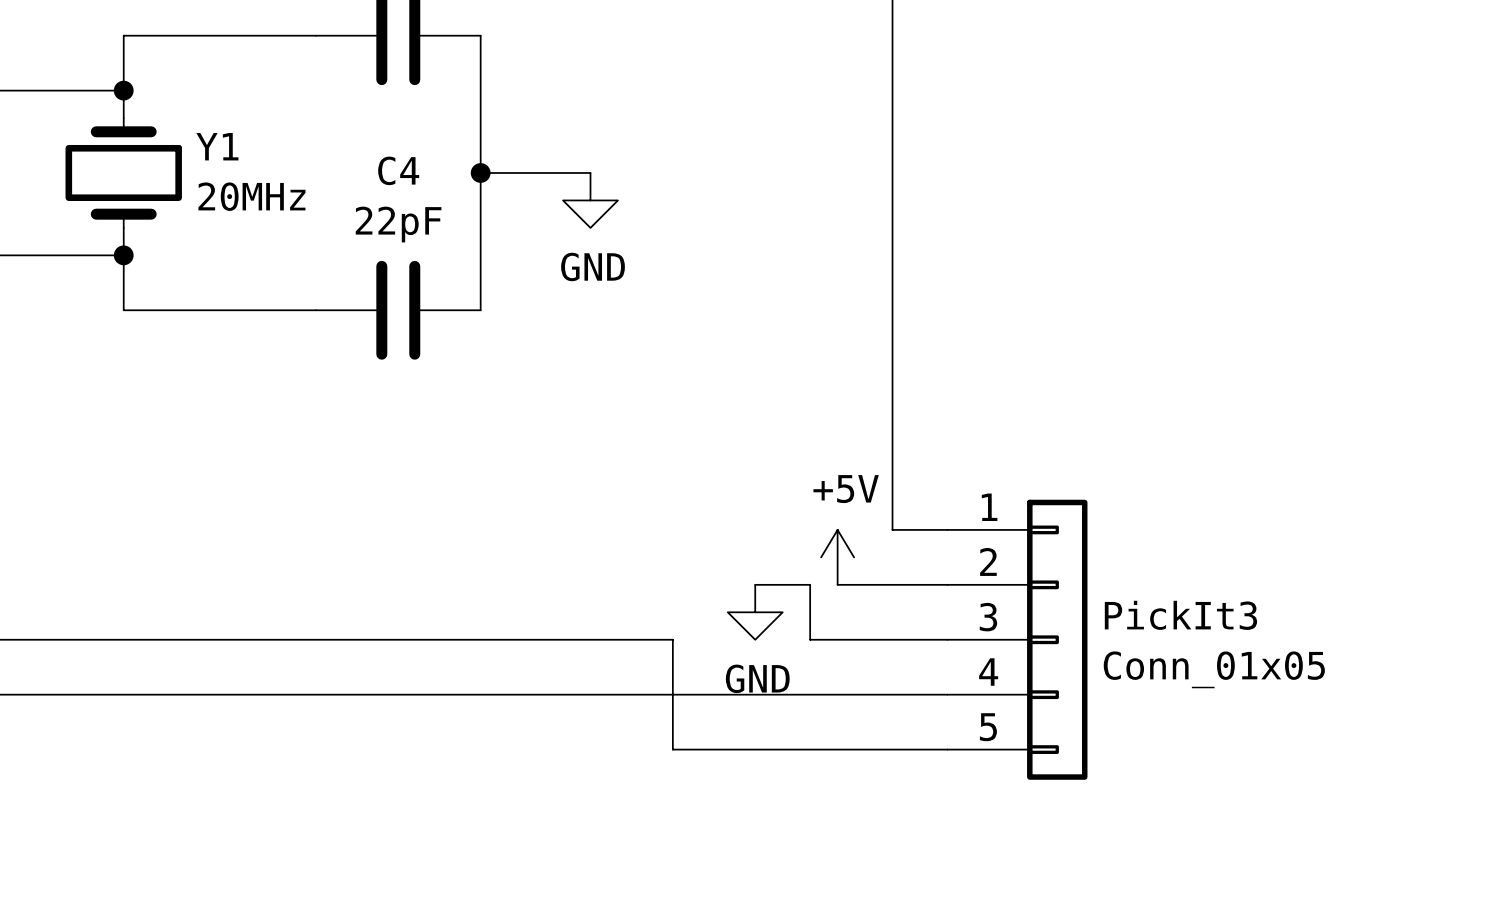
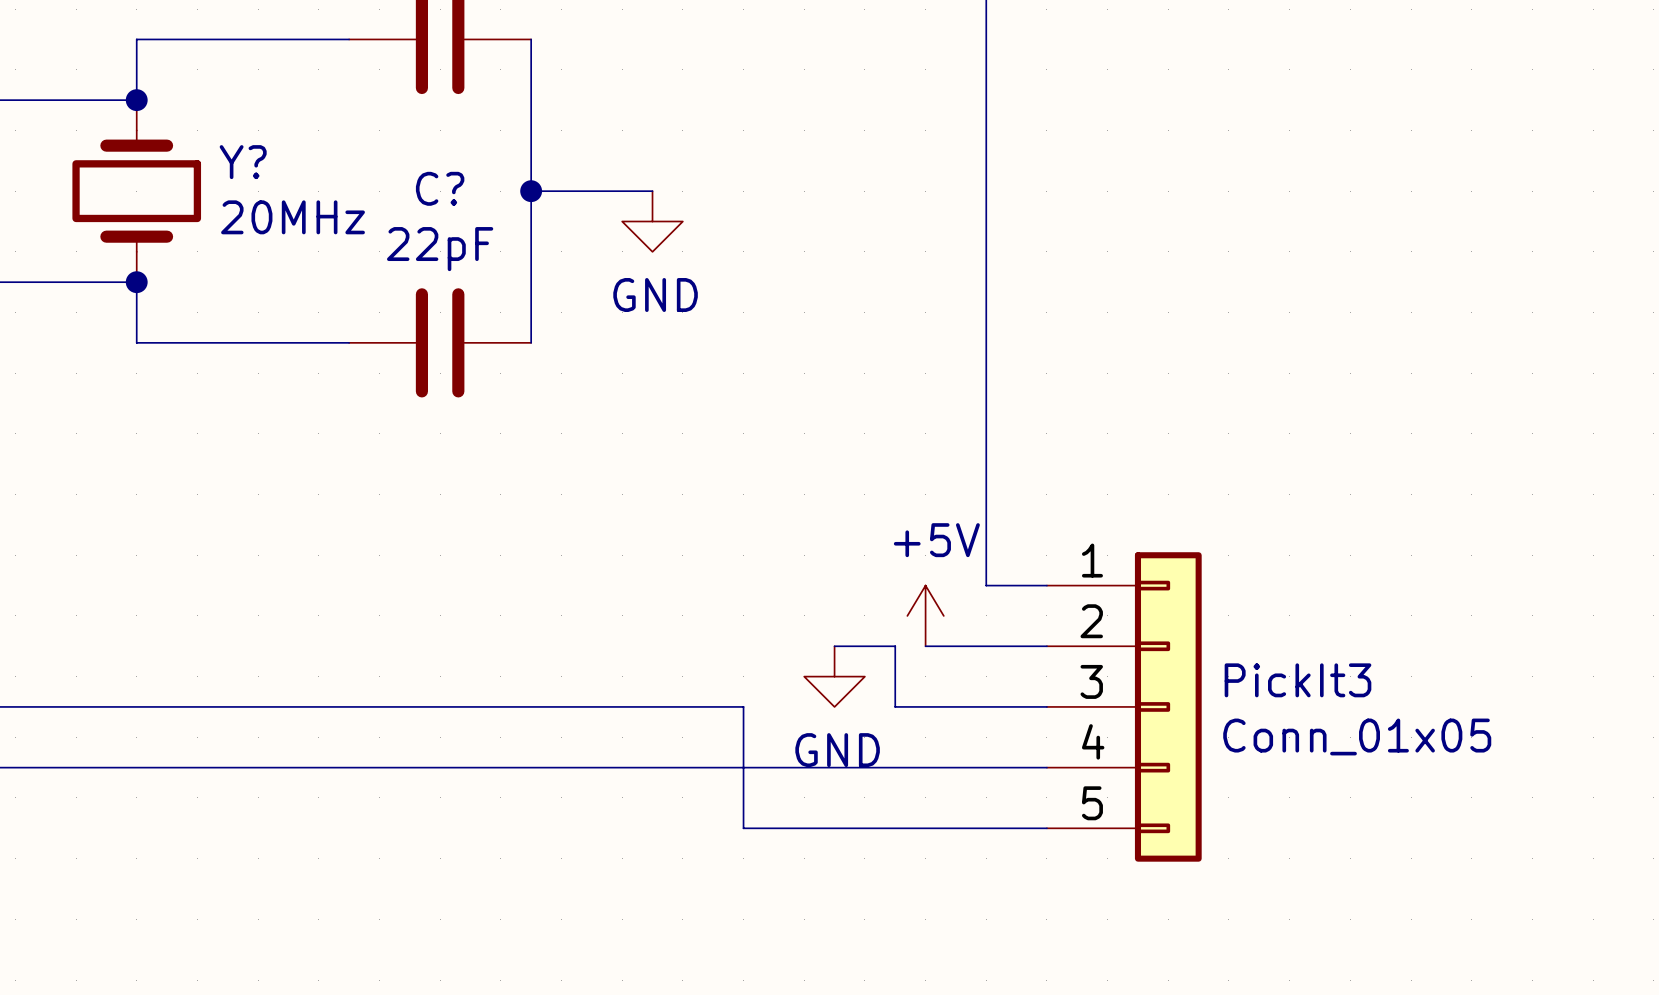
Y1 name: Y1 (217, 146) -> Y? (243, 162)
C4 name: C4 (398, 170) -> C? (440, 188)

